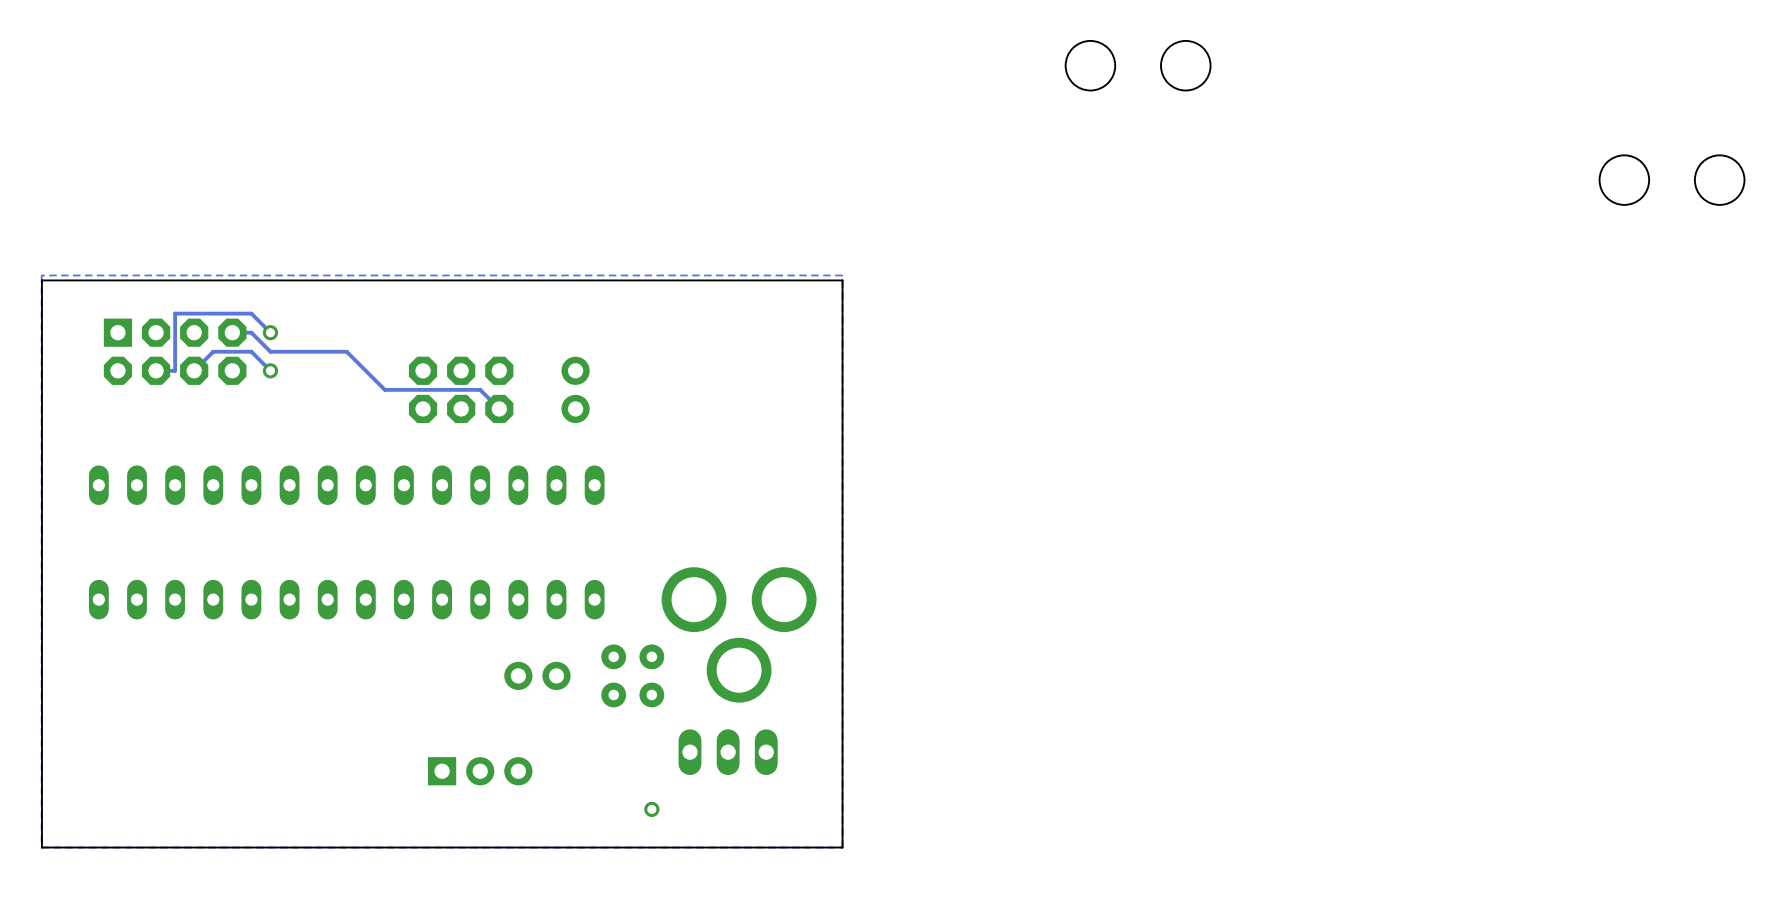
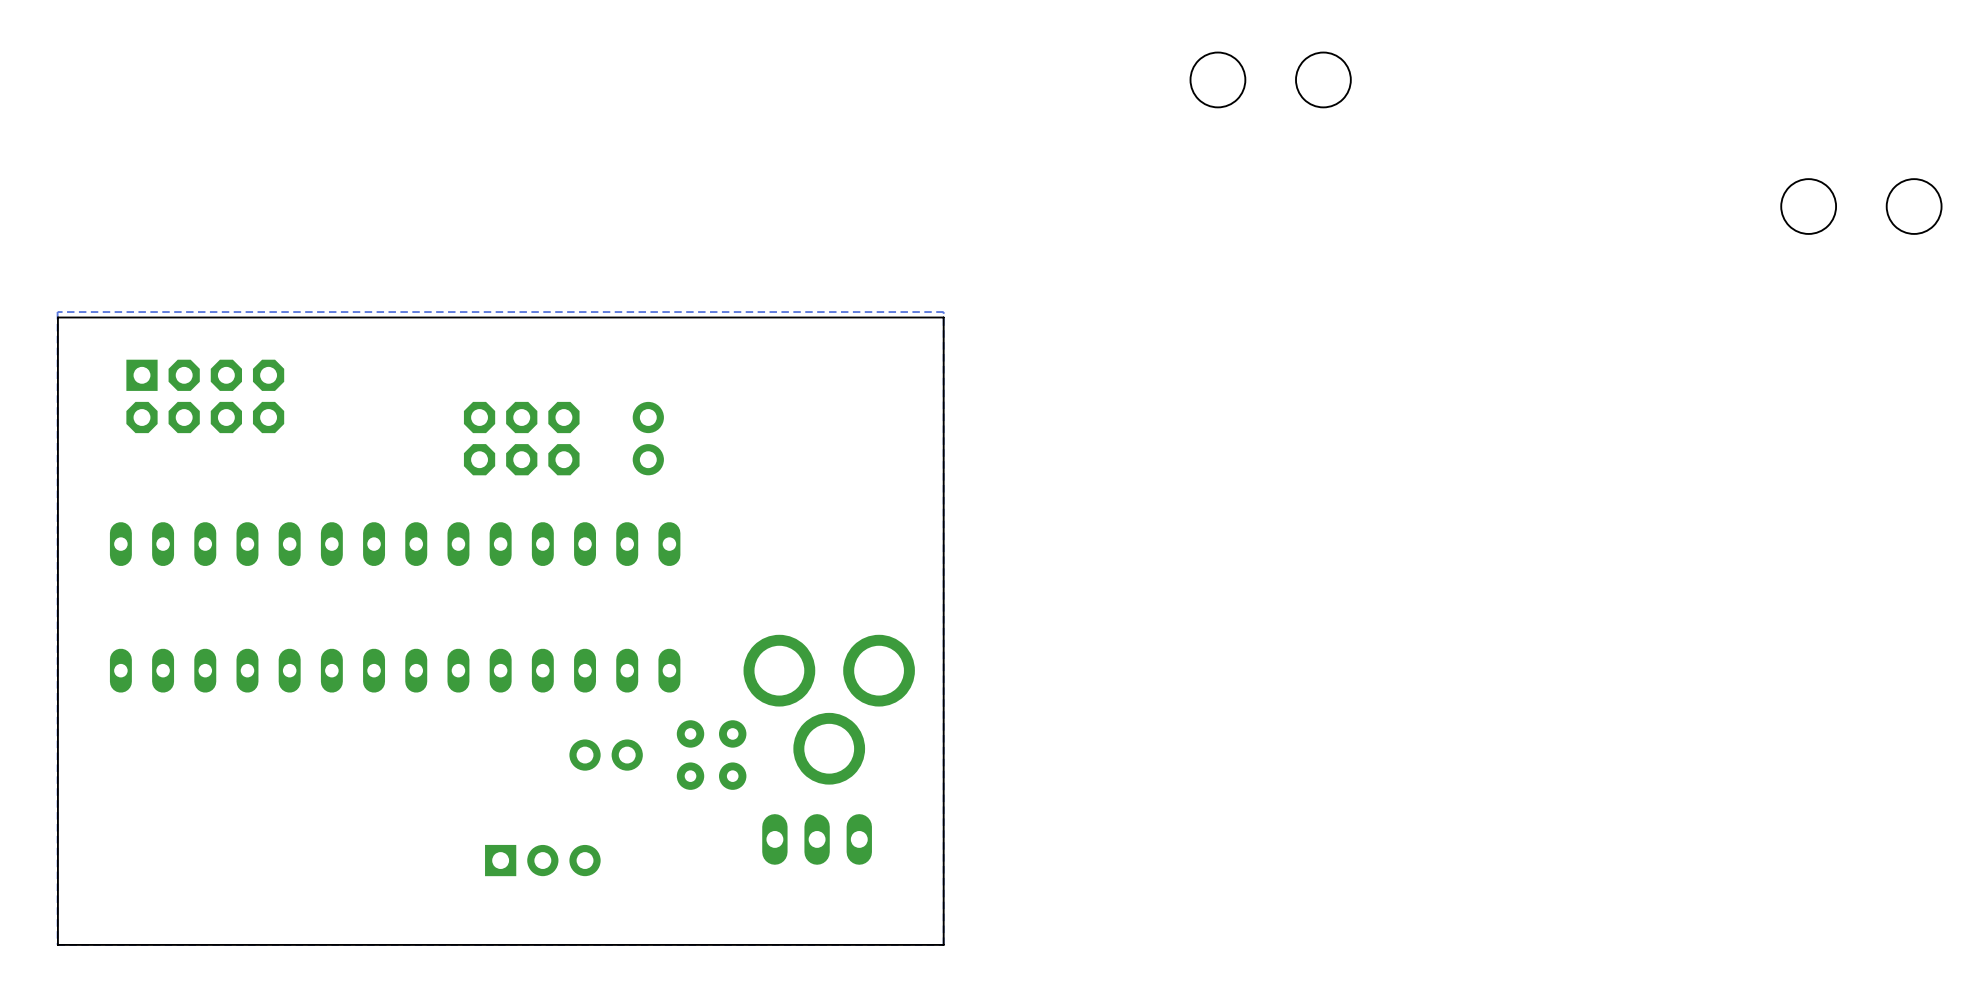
track: (232, 332) (251, 332) (270, 351) (346, 351) (384, 389) (480, 389) (499, 408) -> none
track: (270, 332) (251, 313) (175, 313) (175, 370) (156, 370) -> none
via: (270, 332) -> none
track: (270, 370) (251, 351) (213, 351) (194, 370) -> none
via: (270, 370) -> none
via: (651, 809) -> none

